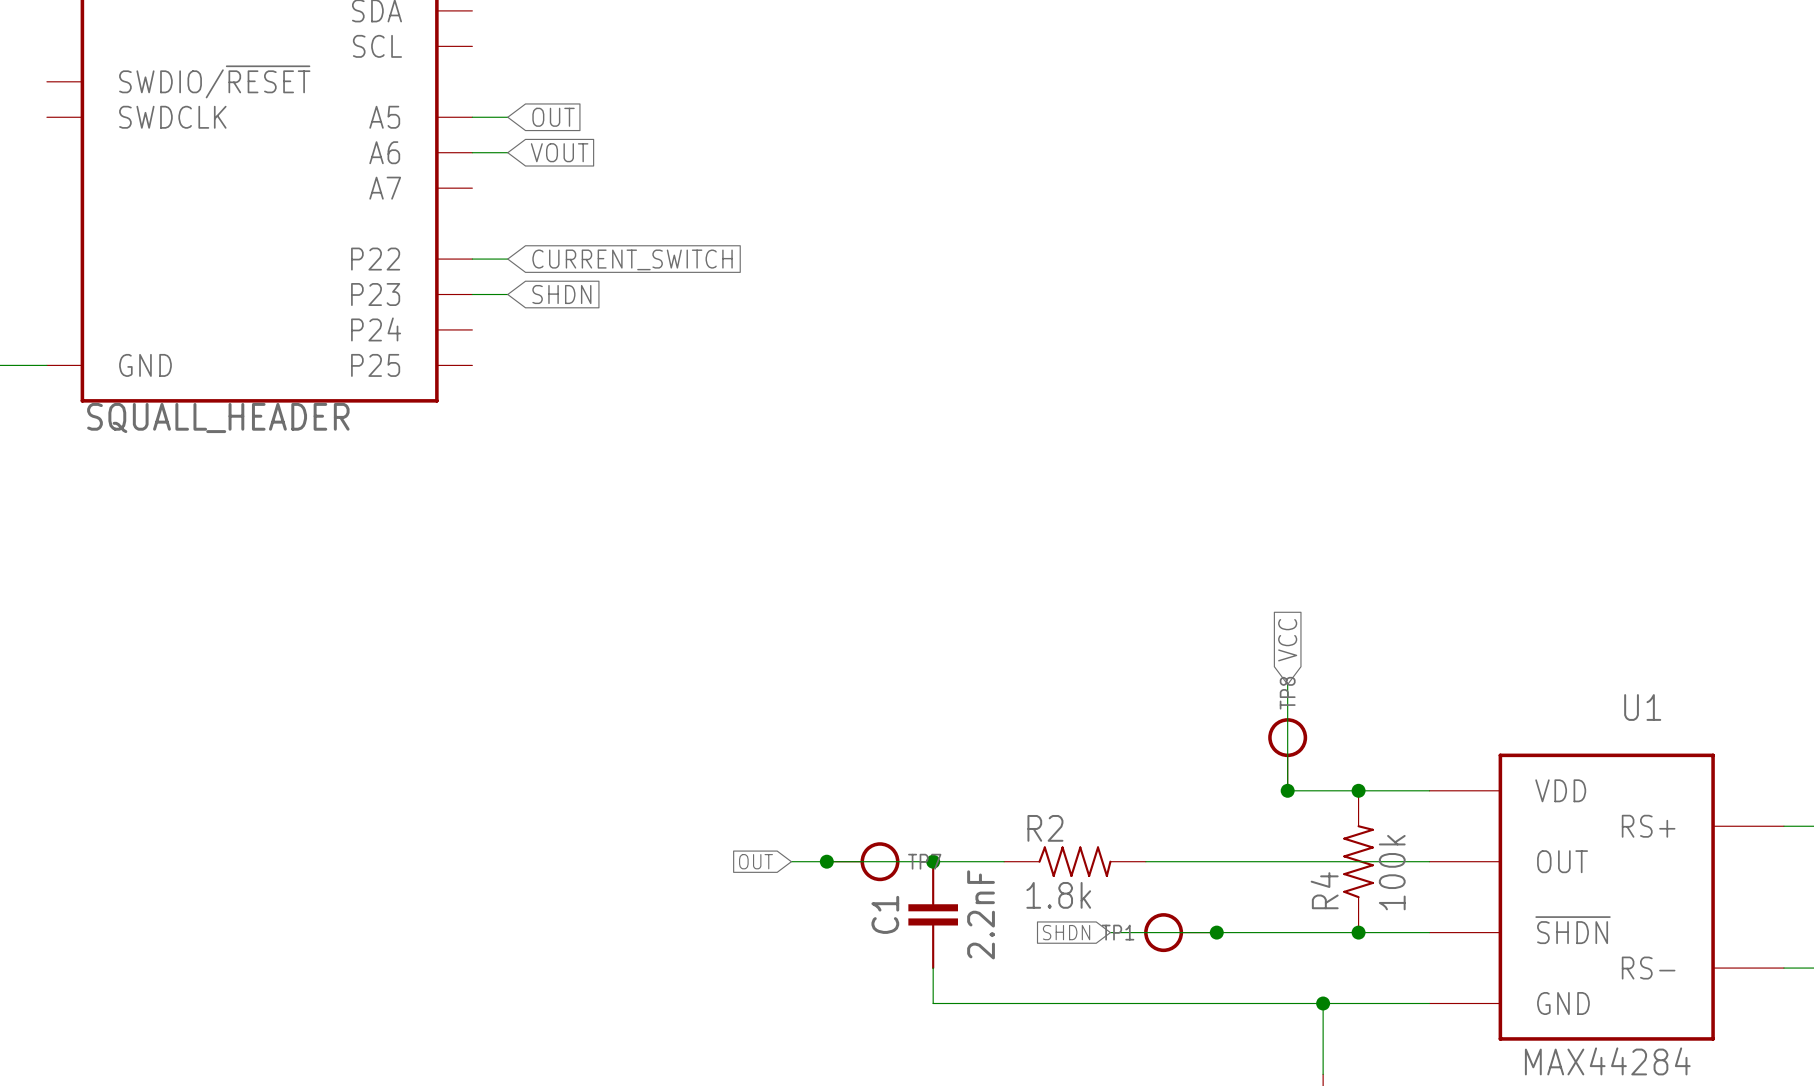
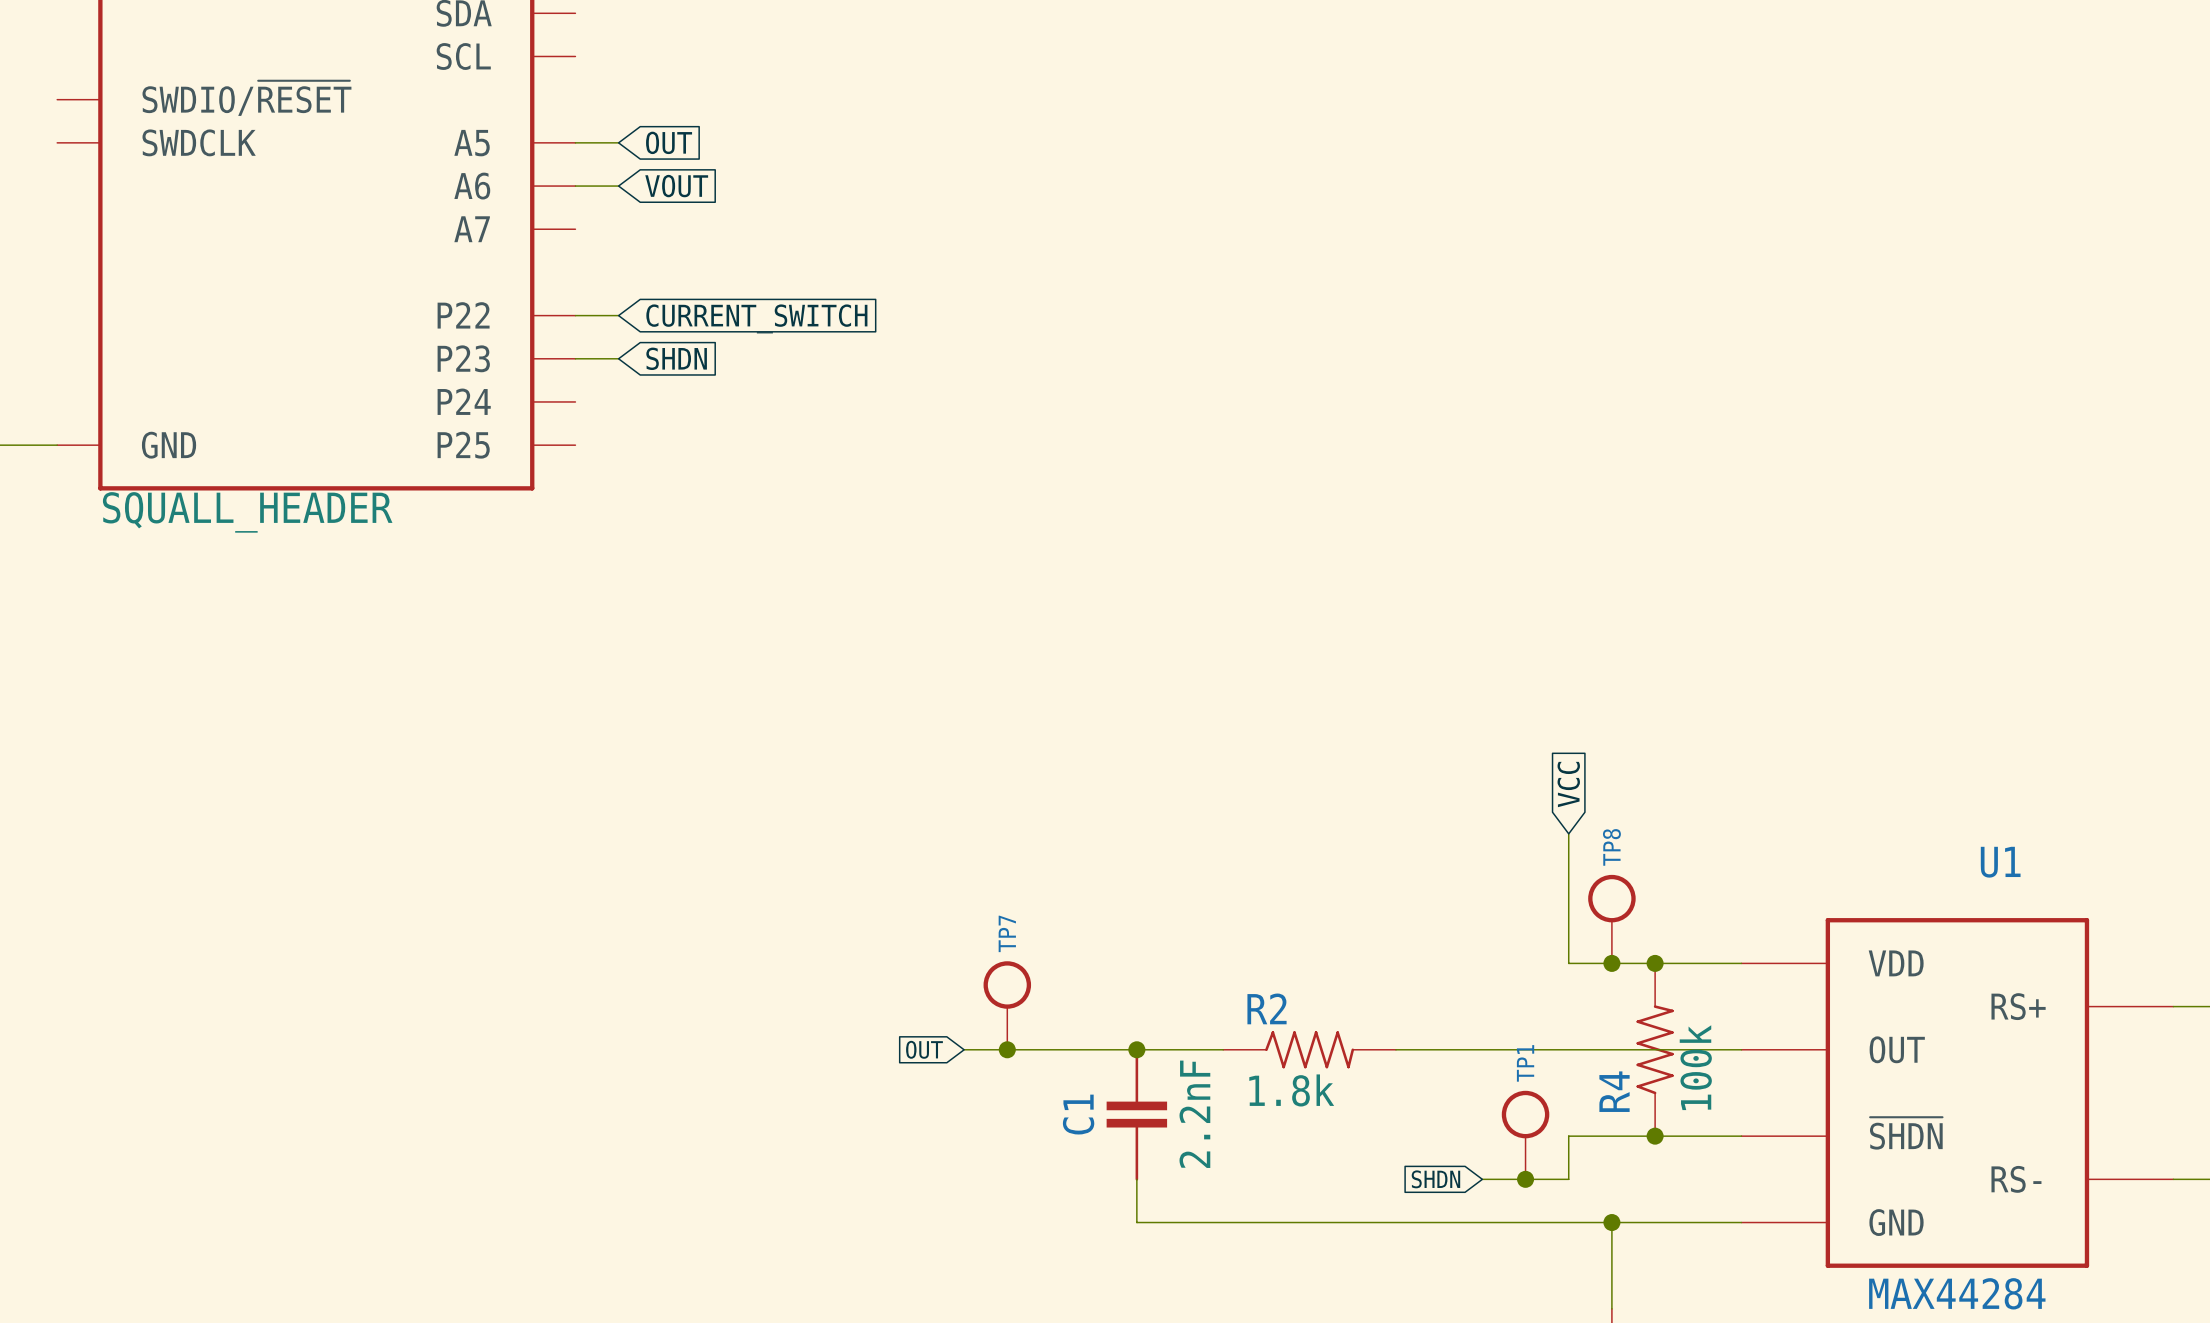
TP8 position: (1287, 754) -> (1611, 919)
junction position: (1287, 790) -> (1611, 963)
TP7 position: (863, 861) -> (1007, 1005)
TP7 rotation: 0° (880, 861) -> 90° counterclockwise (1007, 985)
global label position: SHDN (1066, 932) -> SHDN (1435, 1179)
wire: (1110, 932) (1287, 932) -> (1482, 1179) (1568, 1179) (1568, 1136)
TP1 rotation: 0° (1163, 932) -> 90° clockwise (1525, 1114)
TP1 position: (1180, 932) -> (1525, 1135)
junction position: (1216, 932) -> (1525, 1179)

